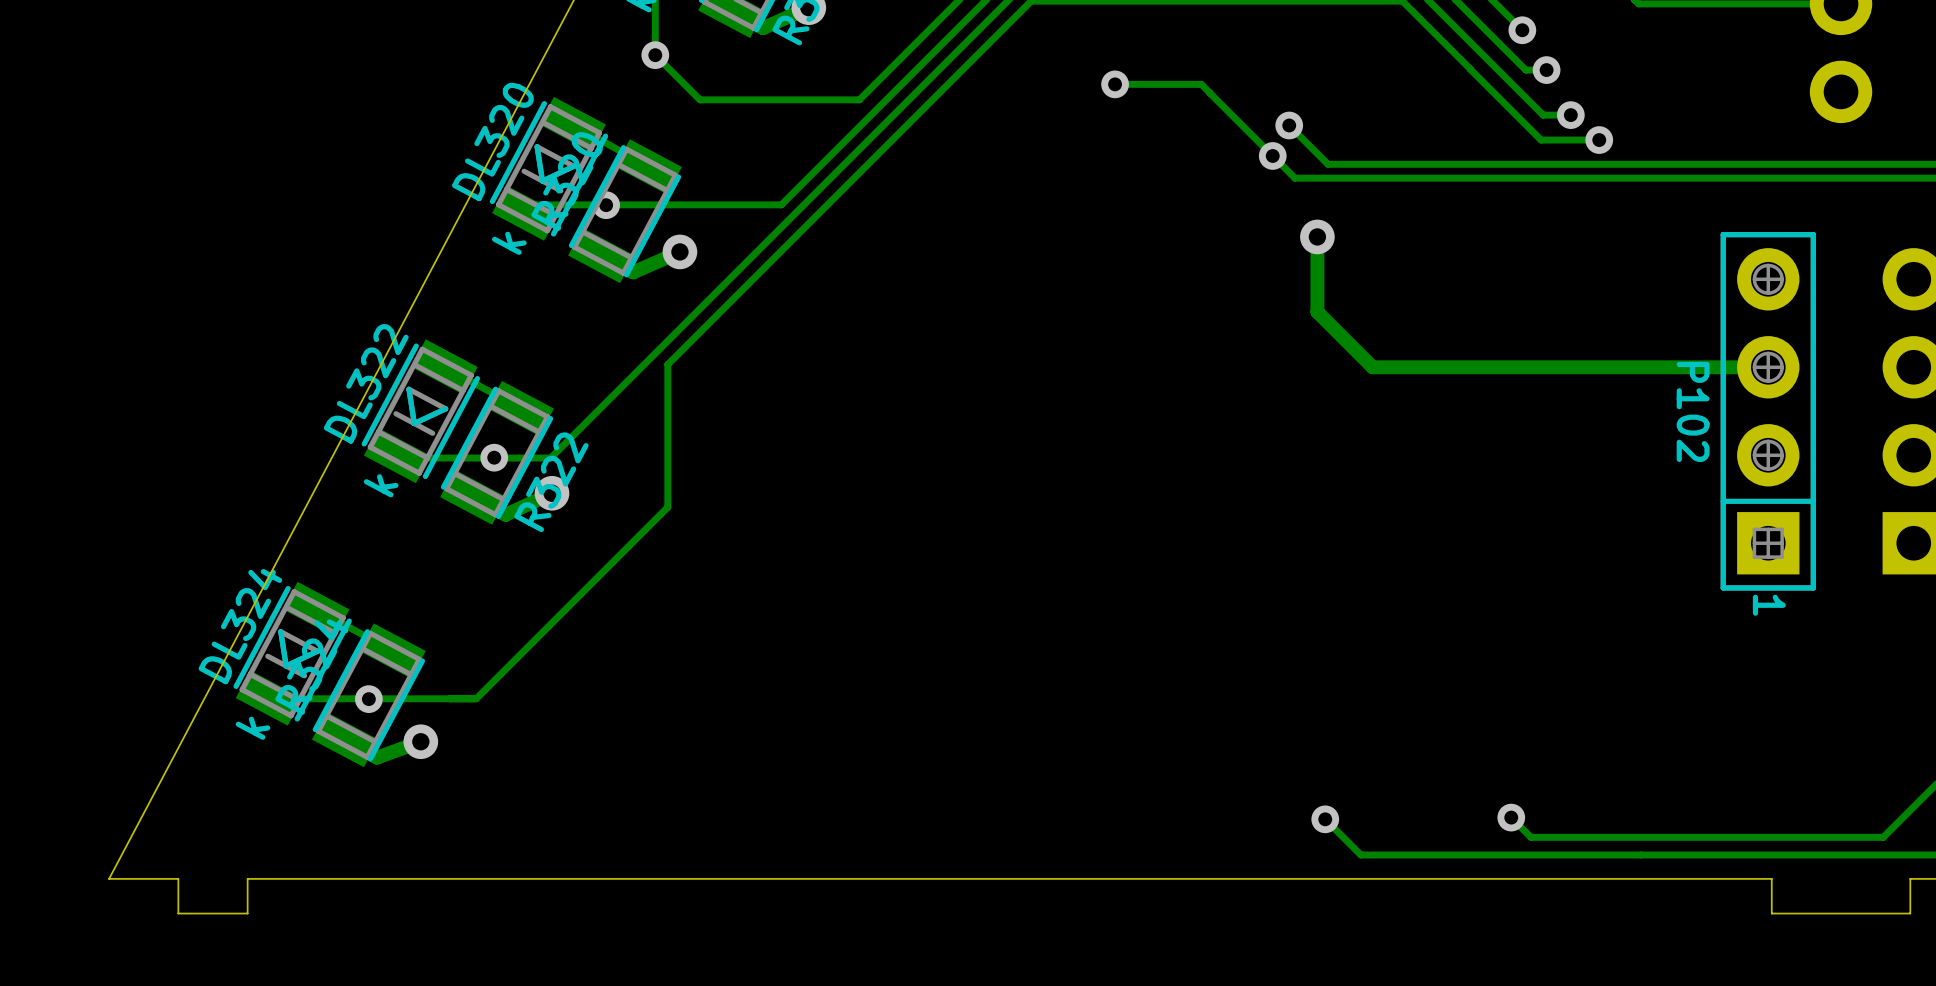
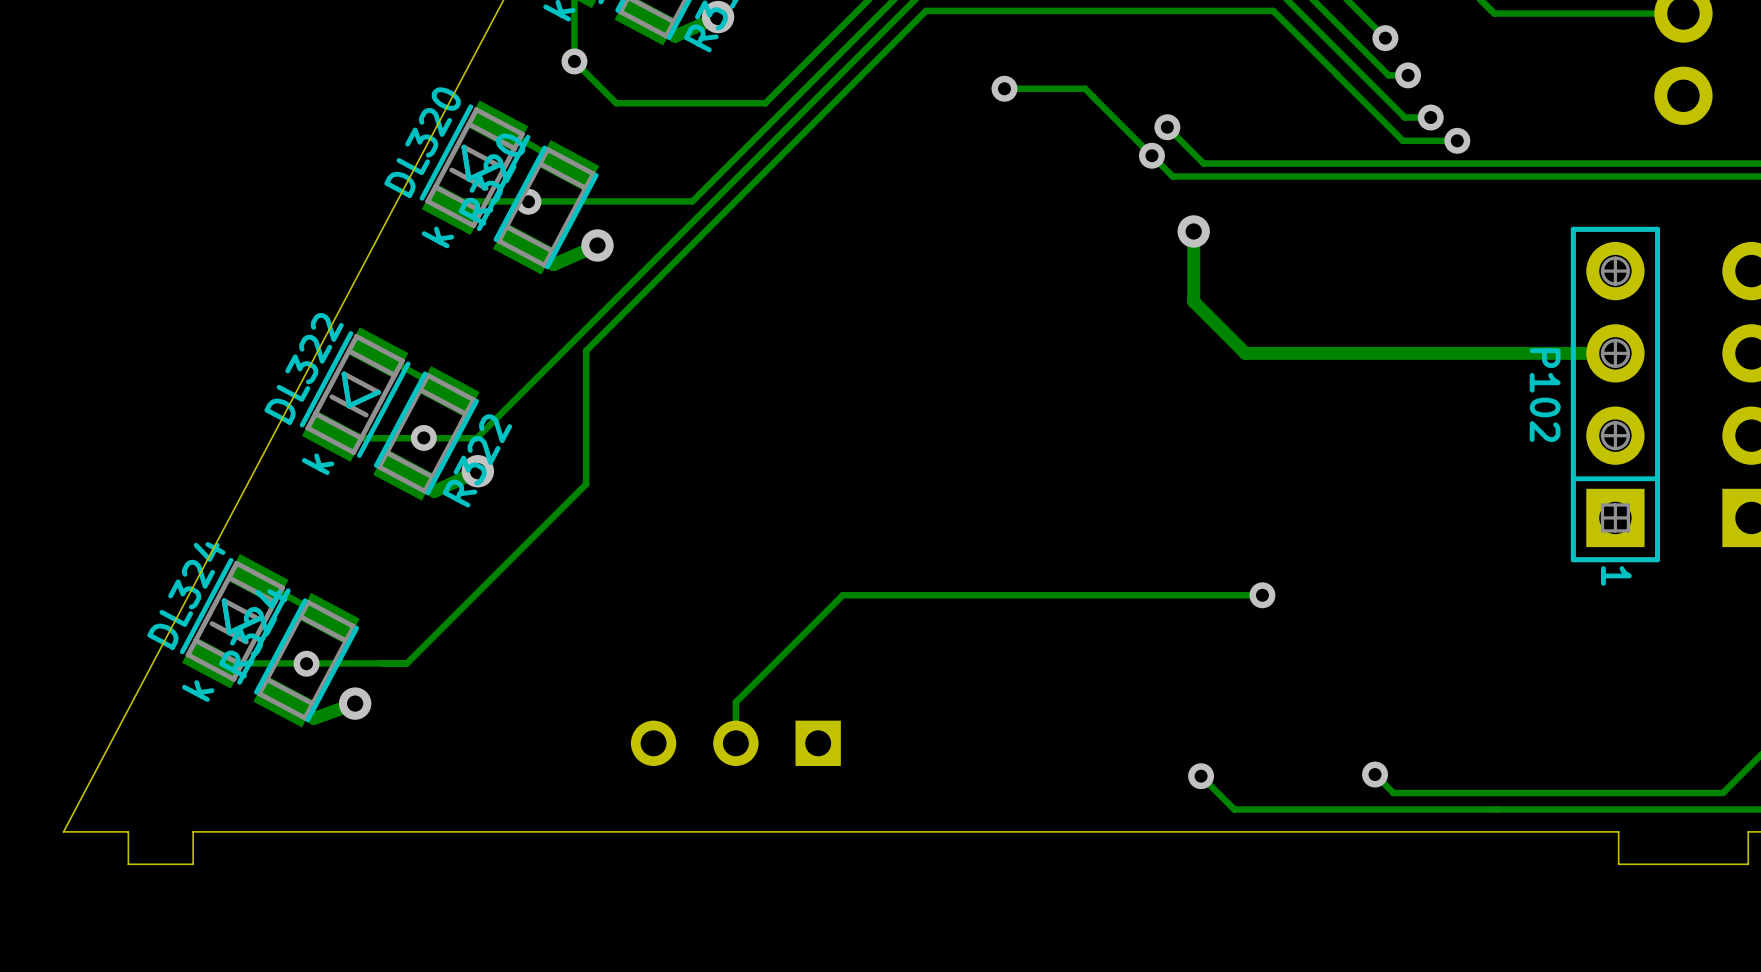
track: none -> (1262, 595) (842, 595) (735, 702) (735, 743)
via: none -> (1262, 595)
part: none -> (735, 743)

